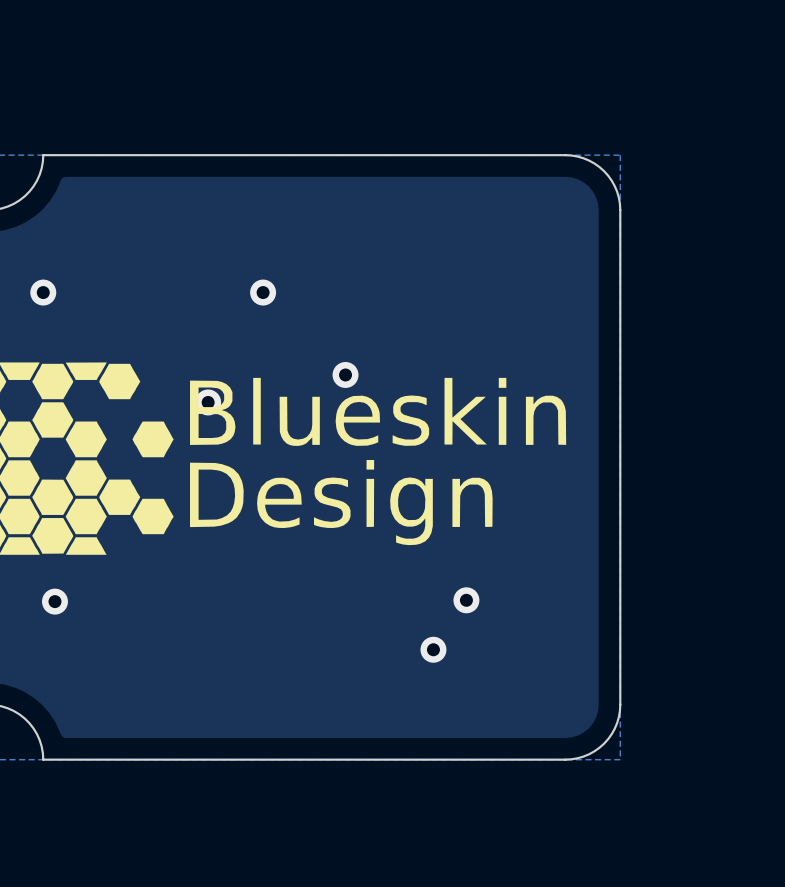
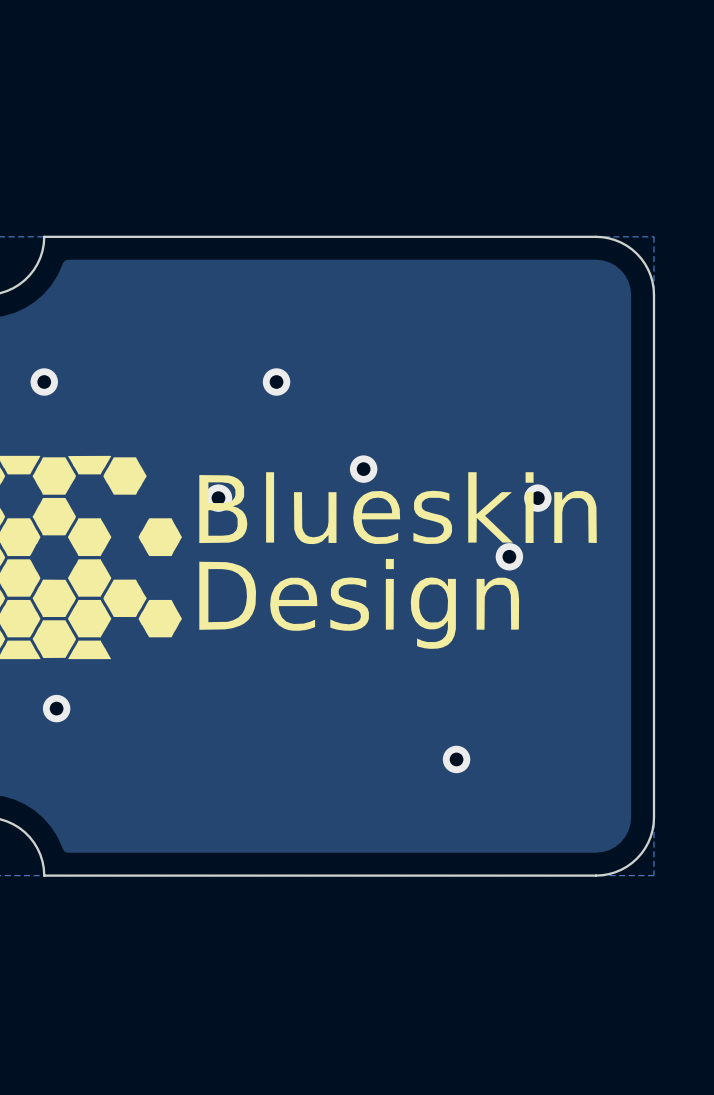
via: none -> (537, 498)
via: none -> (509, 556)
via: (466, 600) -> none

